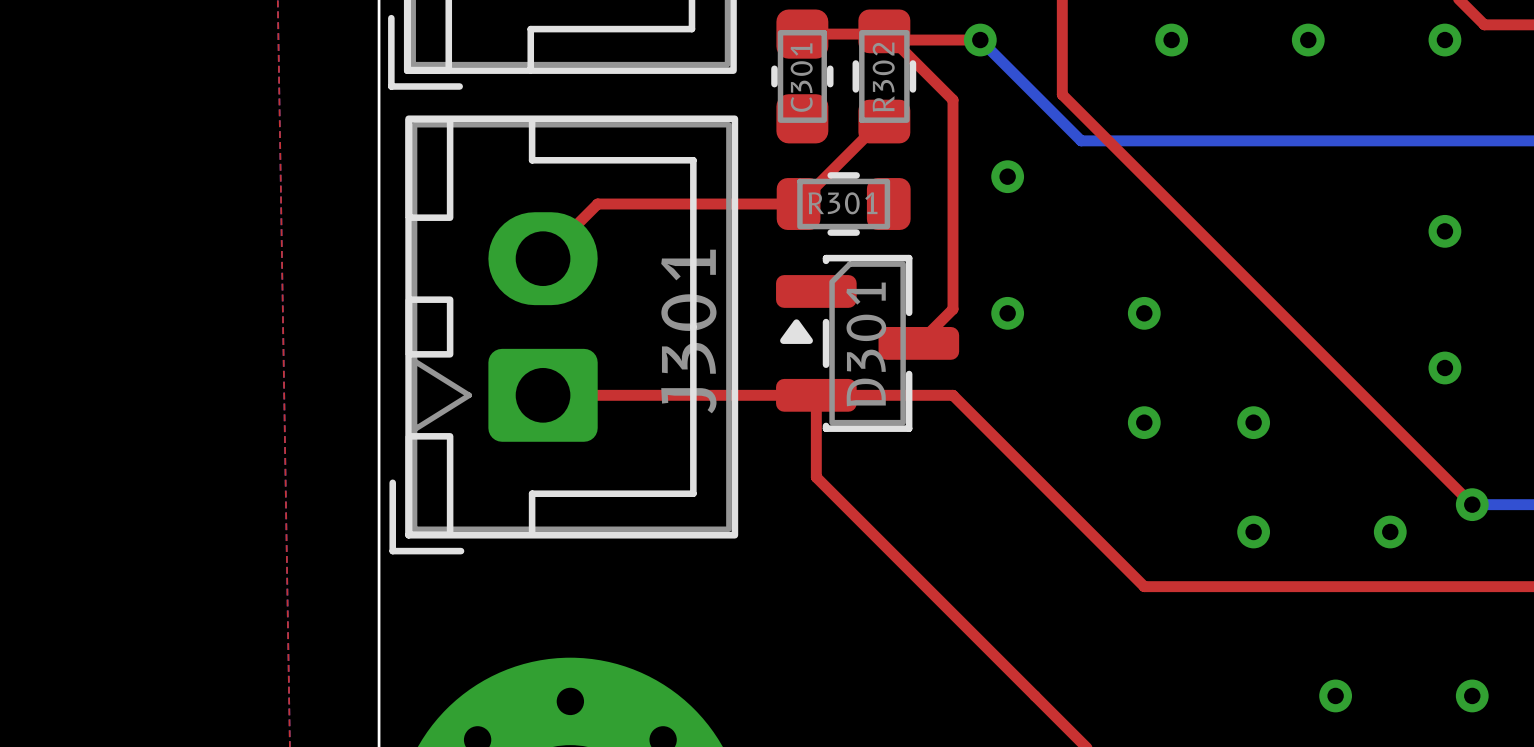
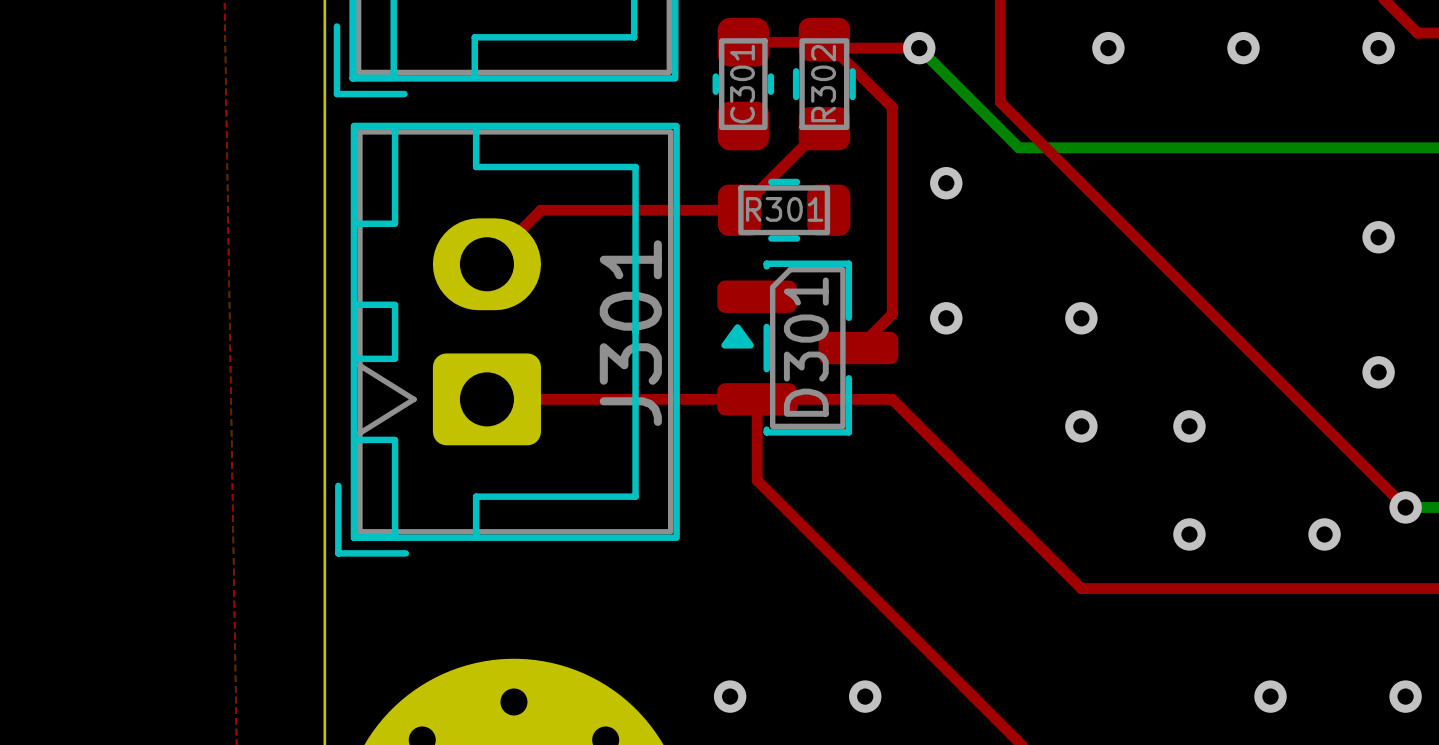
via: none -> (730, 696)
via: none -> (865, 696)

